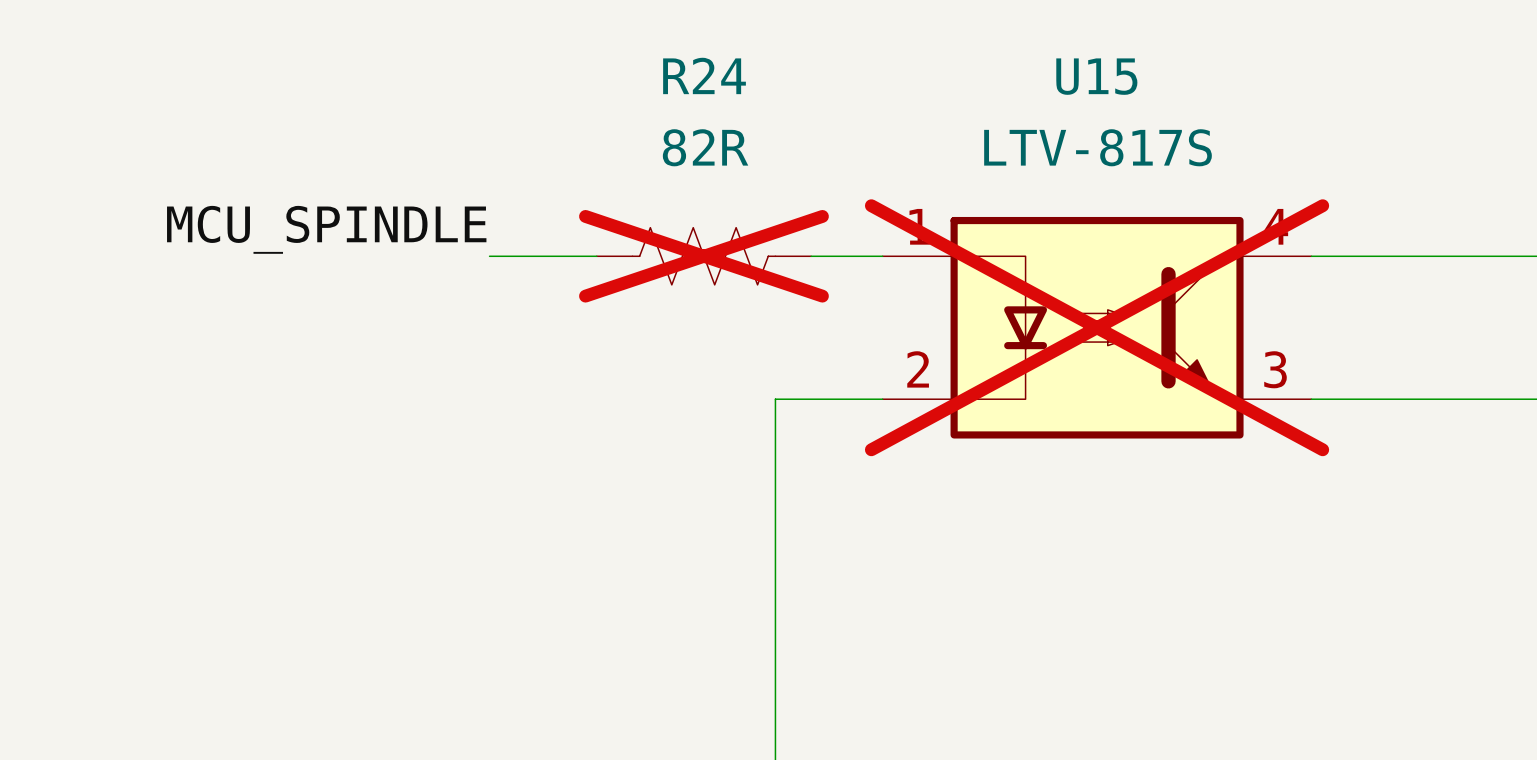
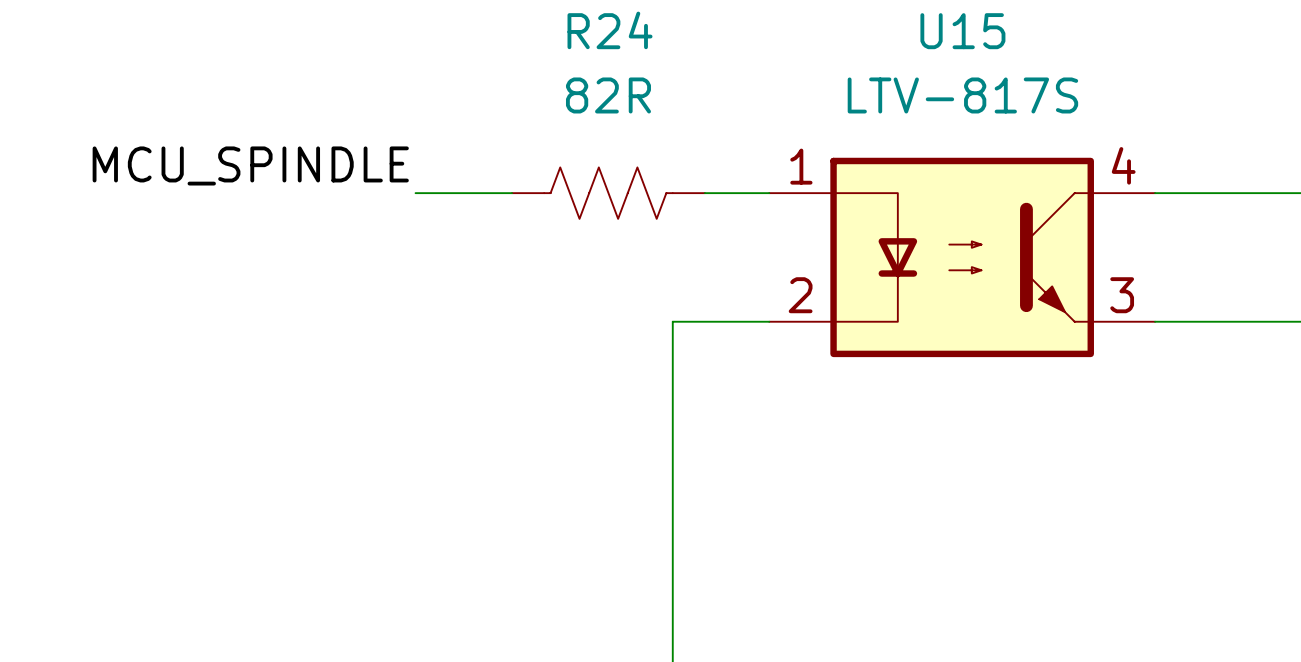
R24 do-not-place cross: (703, 256) -> none
U15 do-not-place cross: (1097, 327) -> none

